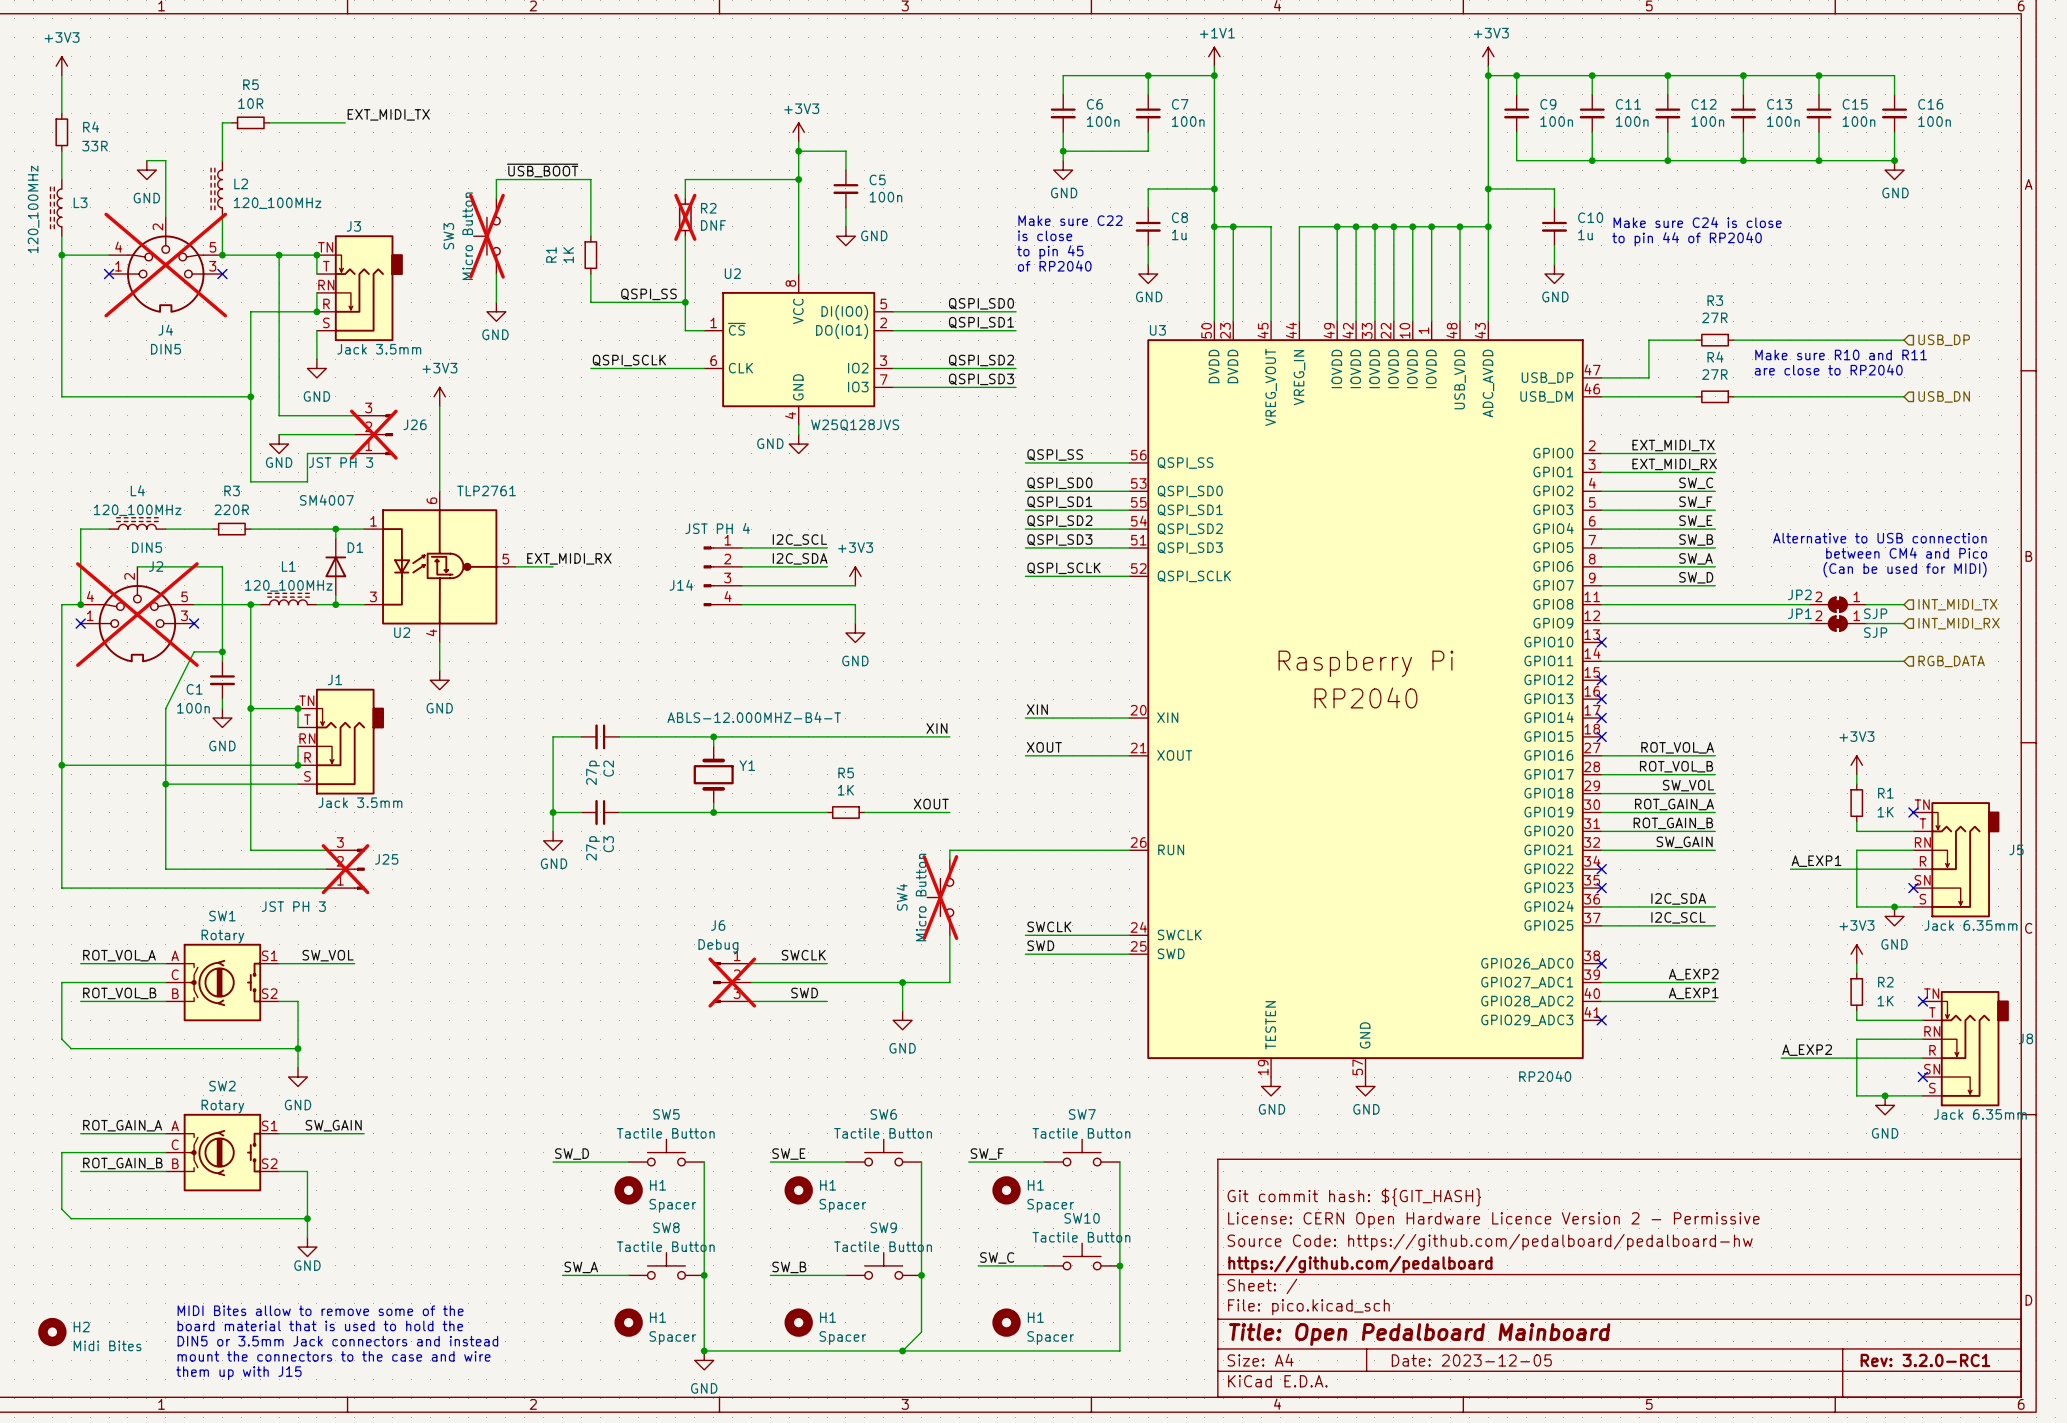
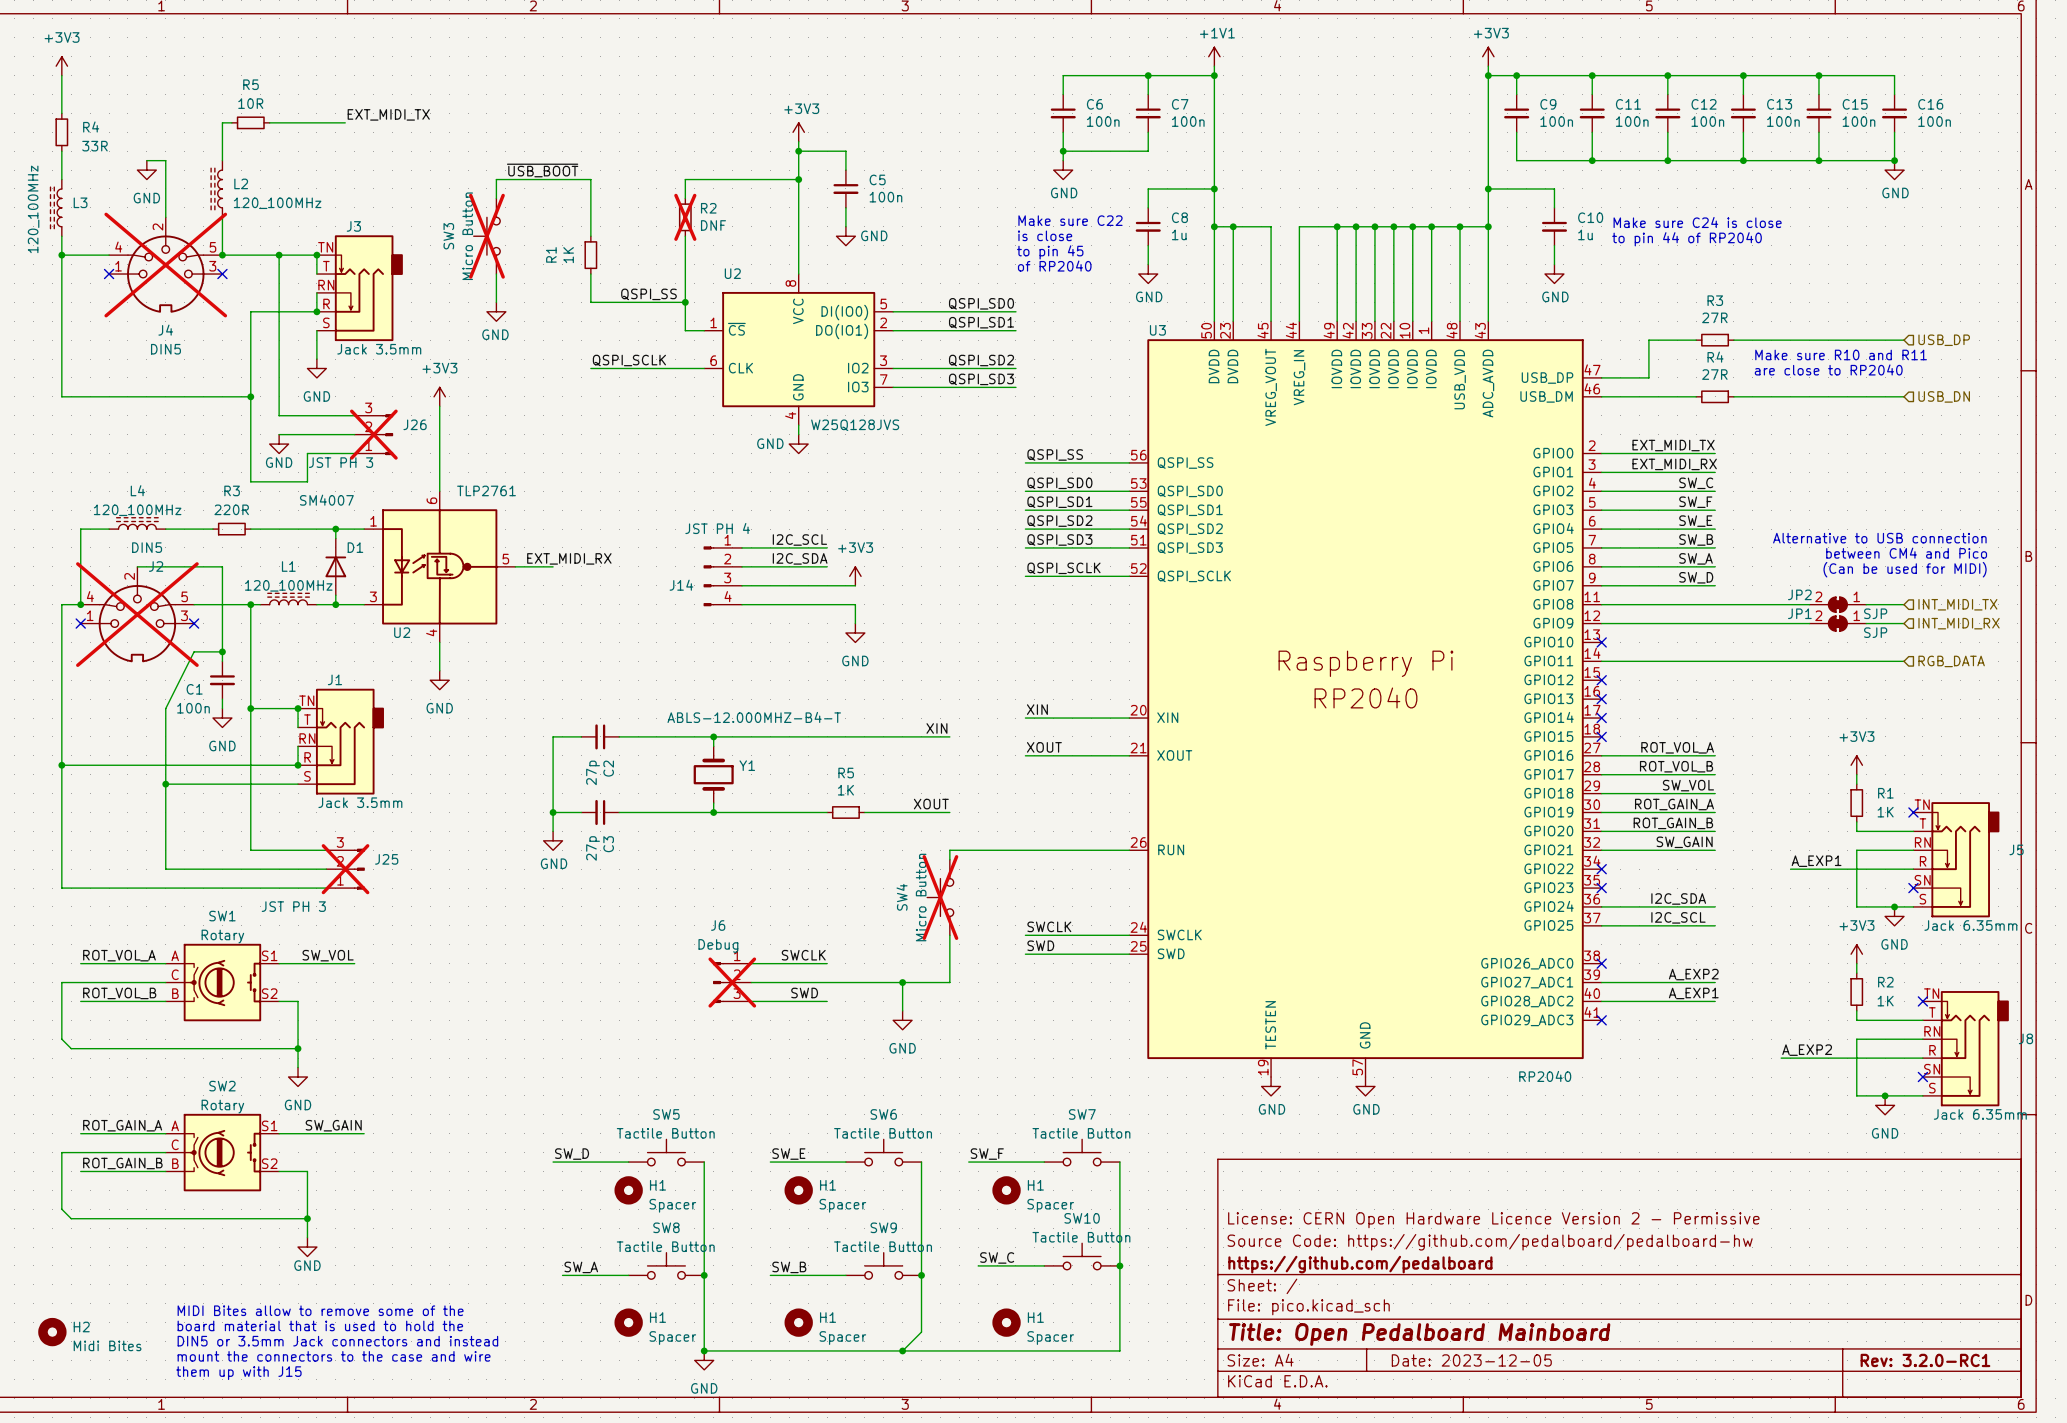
title block: Git commit hash: ${GIT_HASH} (1354, 1197) -> none

